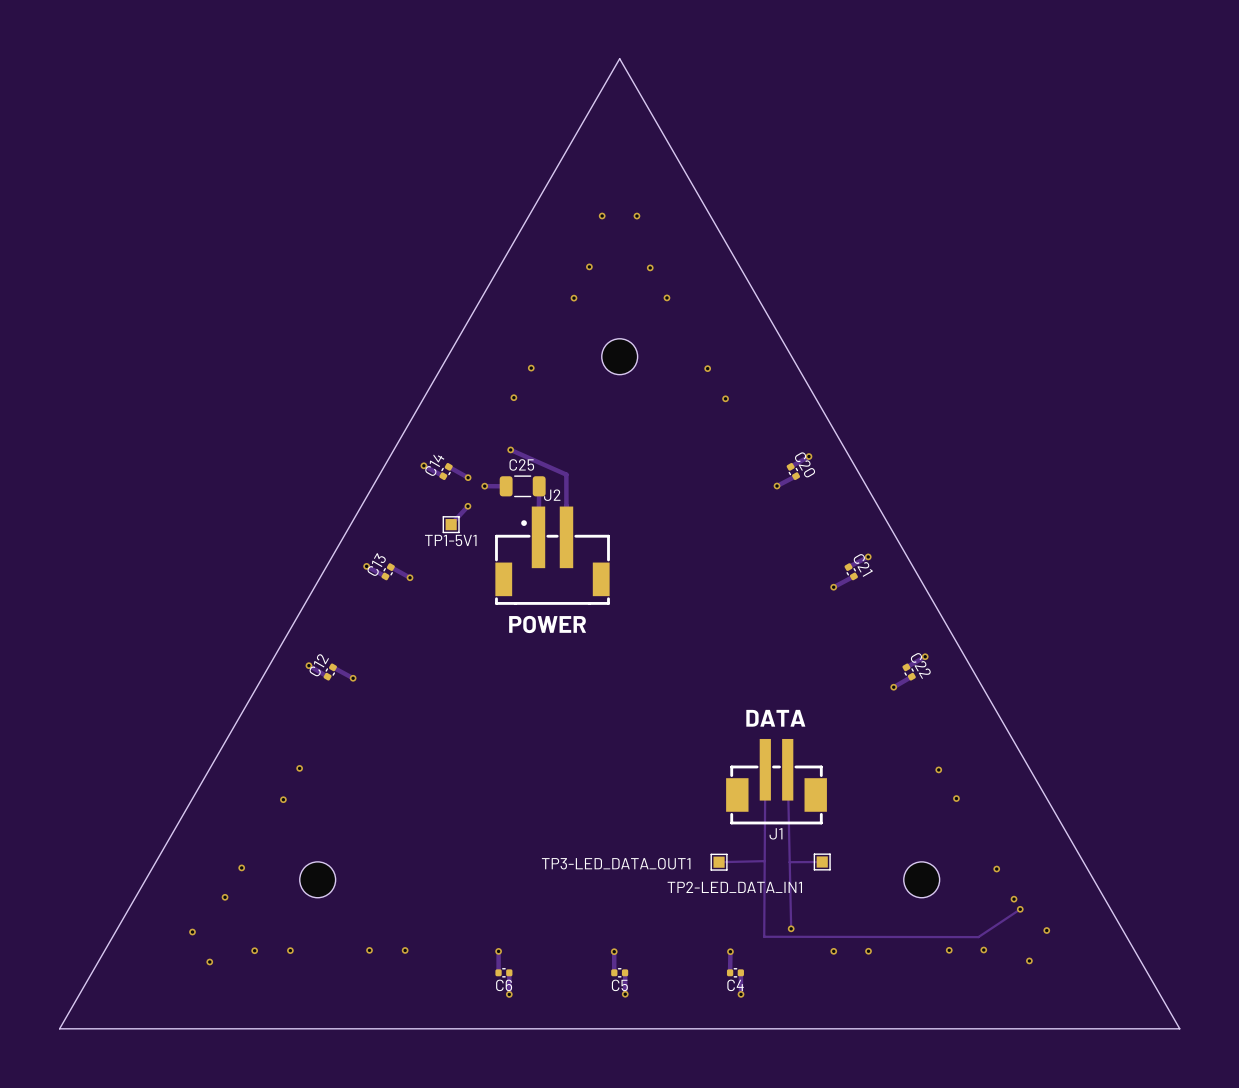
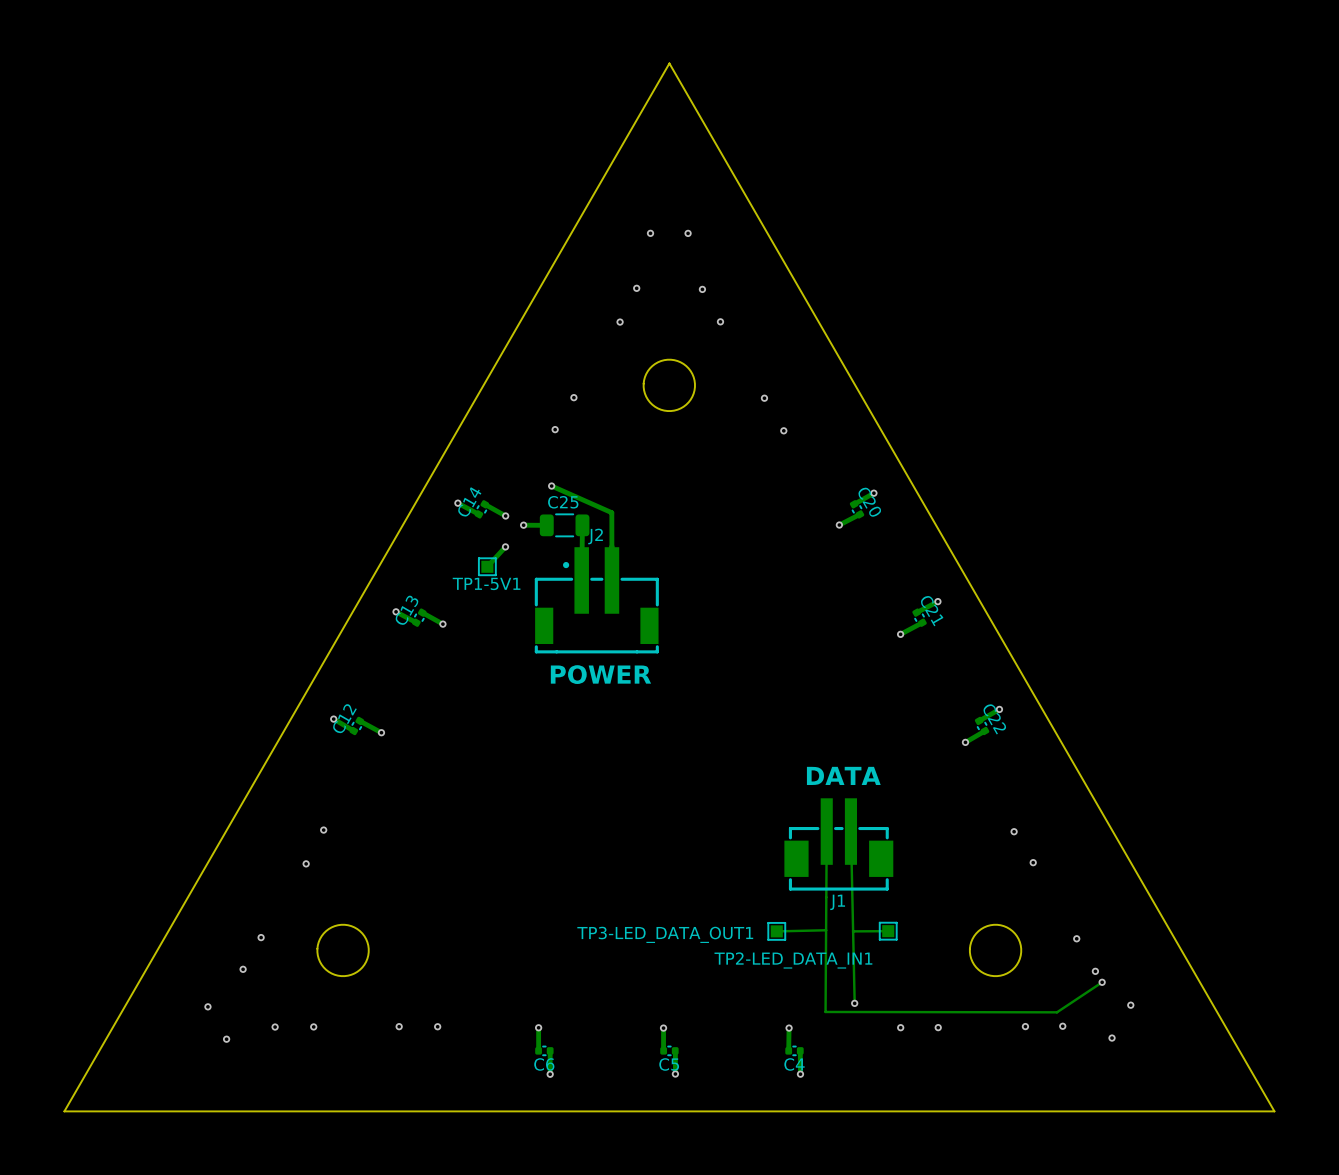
part footprint: [601, 338, 638, 375] -> [643, 359, 695, 412]
part footprint: [299, 861, 336, 898] -> [317, 924, 369, 977]
part footprint: [903, 861, 940, 898] -> [969, 924, 1022, 977]

